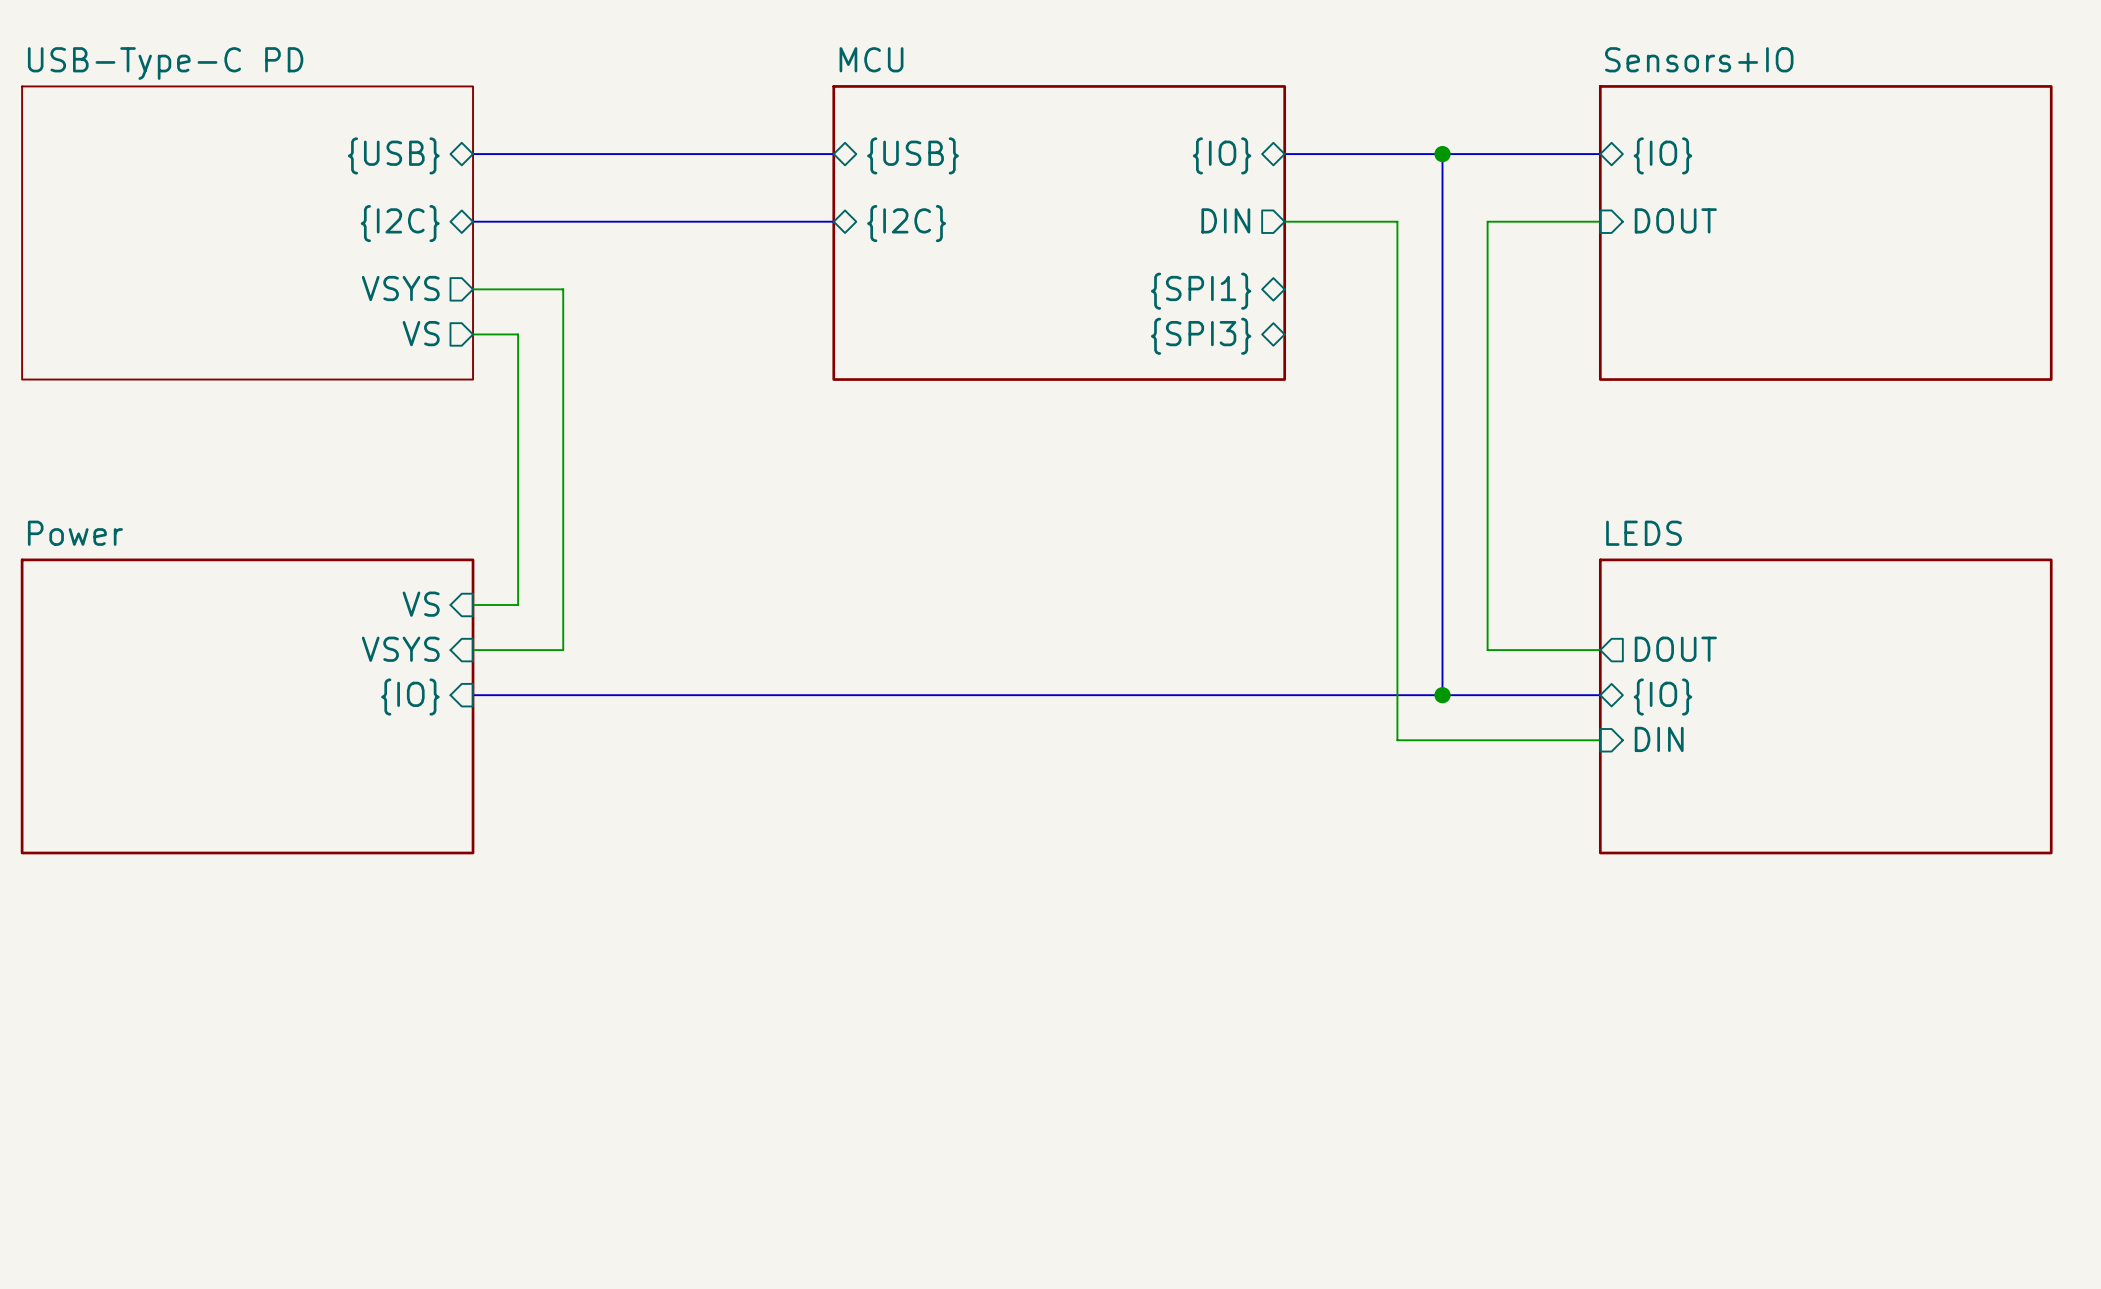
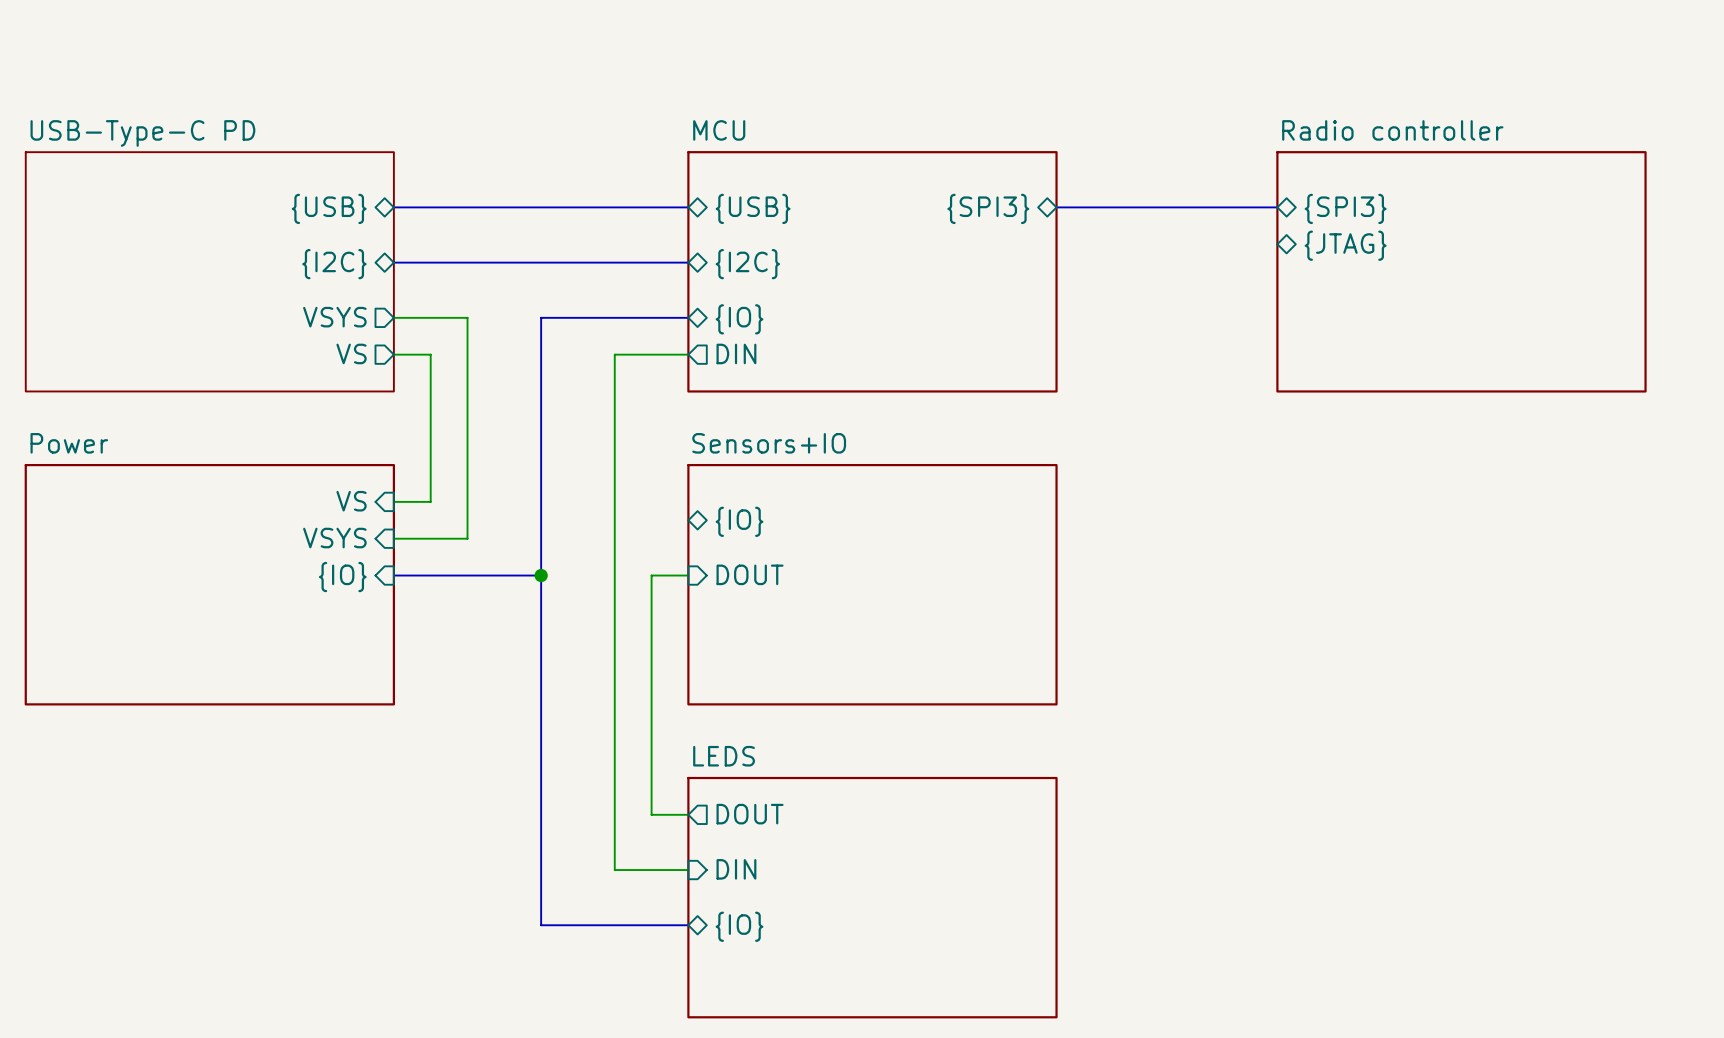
bus: (473, 154) (833, 154) -> (393, 207) (688, 207)
bus: (1284, 154) (1600, 154) -> none
bus: (1442, 154) (1442, 695) -> none
junction: (1442, 154) -> none
sheet pin position: {USB} (393, 155) -> {USB} (329, 208)
sheet pin position: {USB} (913, 155) -> {USB} (753, 208)
sheet pin: {IO} (1222, 155) -> none
sheet pin: {IO} (1662, 155) -> none
sheet pin: DIN (1225, 220) -> none
sheet pin: DOUT (1675, 220) -> none
bus: (473, 221) (833, 221) -> (393, 262) (688, 262)
wire: (1284, 221) (1397, 221) (1397, 740) (1600, 740) -> none
wire: (1600, 221) (1487, 221) (1487, 650) (1600, 650) -> none
sheet pin position: {I2C} (400, 223) -> {I2C} (334, 264)
sheet pin position: {I2C} (906, 223) -> {I2C} (747, 264)
sheet USB-Type-C PD position: (247, 232) -> (209, 271)
sheet MCU position: (1059, 232) -> (872, 271)
sheet Sensors+IO: (1825, 232) -> none
bus: none -> (1056, 207) (1277, 207)
sheet pin: none -> {SPI3} (1345, 208)
sheet pin position: VSYS (400, 288) -> VSYS (334, 317)
wire: (473, 289) (563, 289) (563, 379) -> (393, 317) (467, 317)
sheet pin: {SPI1} (1201, 291) -> none
sheet pin: none -> {JTAG} (1345, 245)
sheet Radio controller: none -> (1461, 271)
sheet pin position: VS (421, 333) -> VS (351, 353)
wire: (473, 334) (518, 334) (518, 424) -> (393, 354) (430, 354)
sheet pin position: {SPI3} (1201, 336) -> {SPI3} (988, 208)
bus: none -> (688, 317) (541, 317) (541, 925) (688, 925)
sheet pin: none -> {IO} (739, 319)
sheet pin: none -> DIN (736, 353)
wire: none -> (688, 354) (614, 354) (614, 870) (688, 870)
sheet pin: none -> {IO} (739, 521)
sheet pin: DOUT (1675, 649) -> none
sheet pin: none -> DOUT (750, 574)
bus: (653, 695) (1600, 695) -> none
junction: none -> (541, 575)
wire: none -> (688, 575) (651, 575) (651, 814) (688, 814)
junction: (1442, 695) -> none
sheet pin: {IO} (1662, 697) -> none
sheet Sensors+IO: none -> (872, 584)
sheet LEDS: (1825, 706) -> none
sheet pin: DIN (1659, 739) -> none
sheet pin: none -> DOUT (750, 814)
sheet pin: none -> DIN (736, 869)
sheet LEDS: none -> (872, 897)
sheet pin: none -> {IO} (739, 926)

